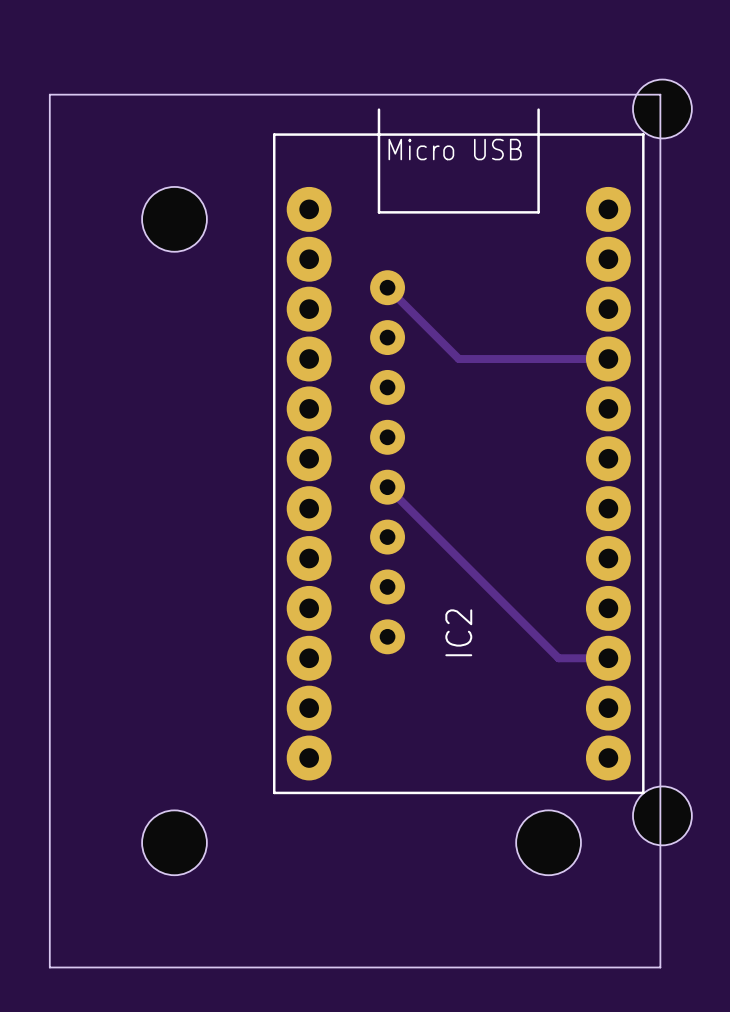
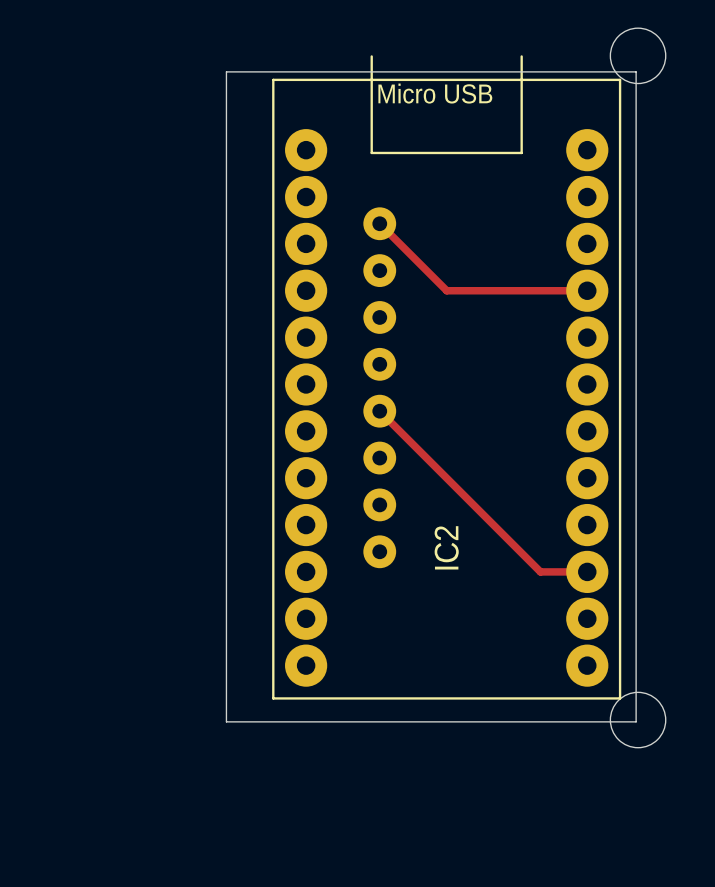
board edge: (660, 126) (660, 94) (49, 94) (49, 967) (660, 967) (660, 817) -> (636, 71) (226, 71) (226, 721) (636, 721)
part: (174, 219) -> none
part: (174, 842) -> none
part: (548, 842) -> none

